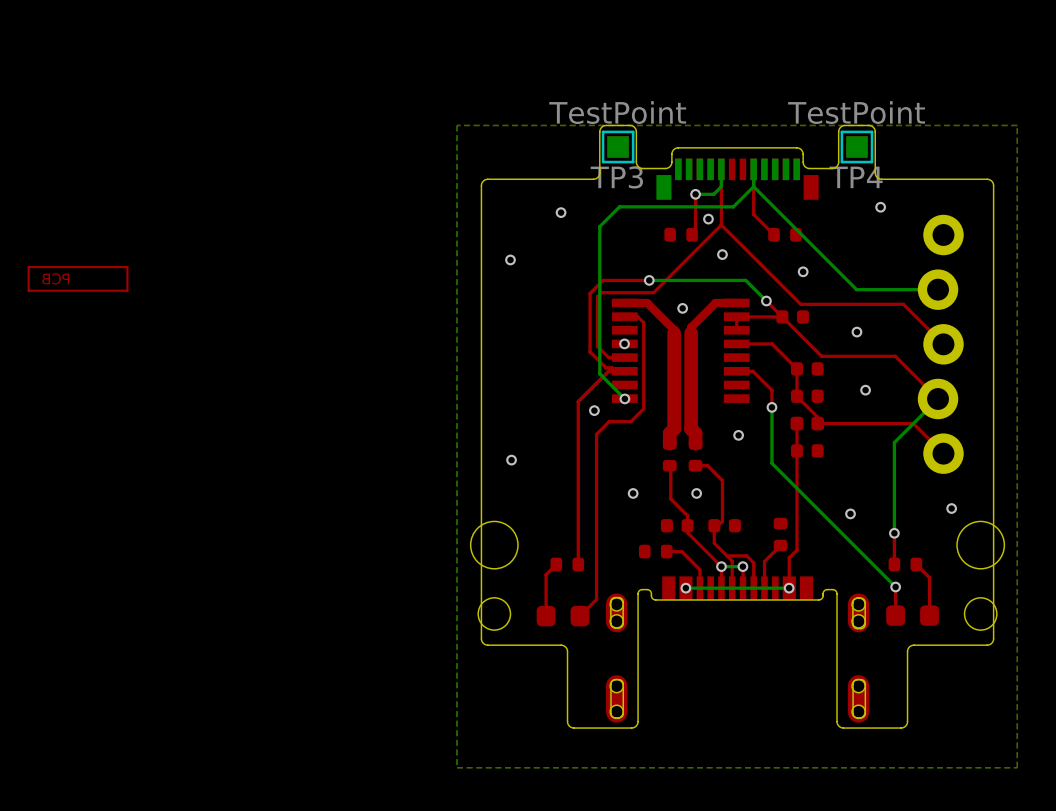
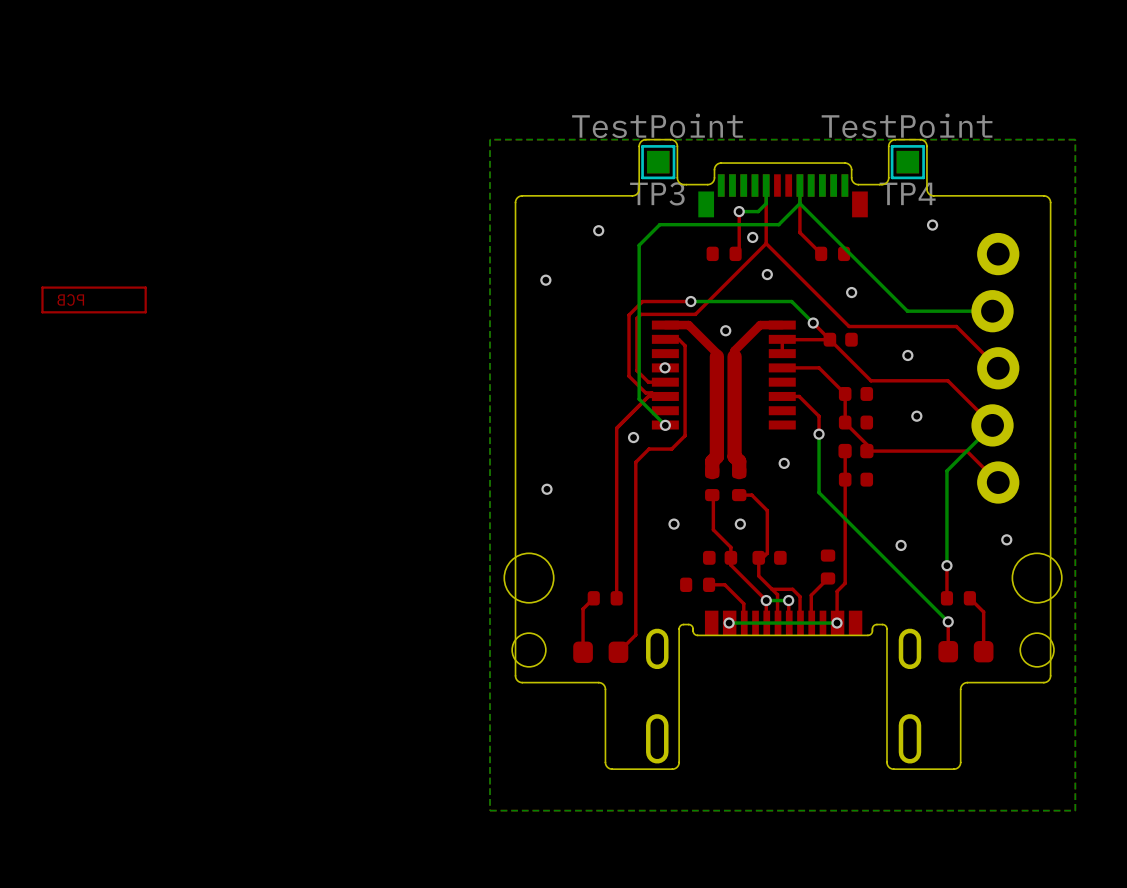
part footprint: [606, 576, 870, 723] -> [646, 610, 922, 764]
board edge: (618, 597) (613, 597) (610, 601) (610, 624) (614, 627) (620, 627) (623, 624) (623, 601) (618, 597) -> none
board edge: (860, 598) (855, 598) (852, 602) (852, 624) (856, 628) (862, 628) (865, 624) (865, 602) (860, 598) -> none
board edge: (618, 679) (613, 680) (611, 683) (611, 714) (614, 717) (620, 717) (623, 714) (623, 683) (618, 679) -> none
board edge: (861, 679) (855, 679) (853, 683) (853, 714) (856, 717) (862, 717) (865, 714) (865, 683) (861, 679) -> none

